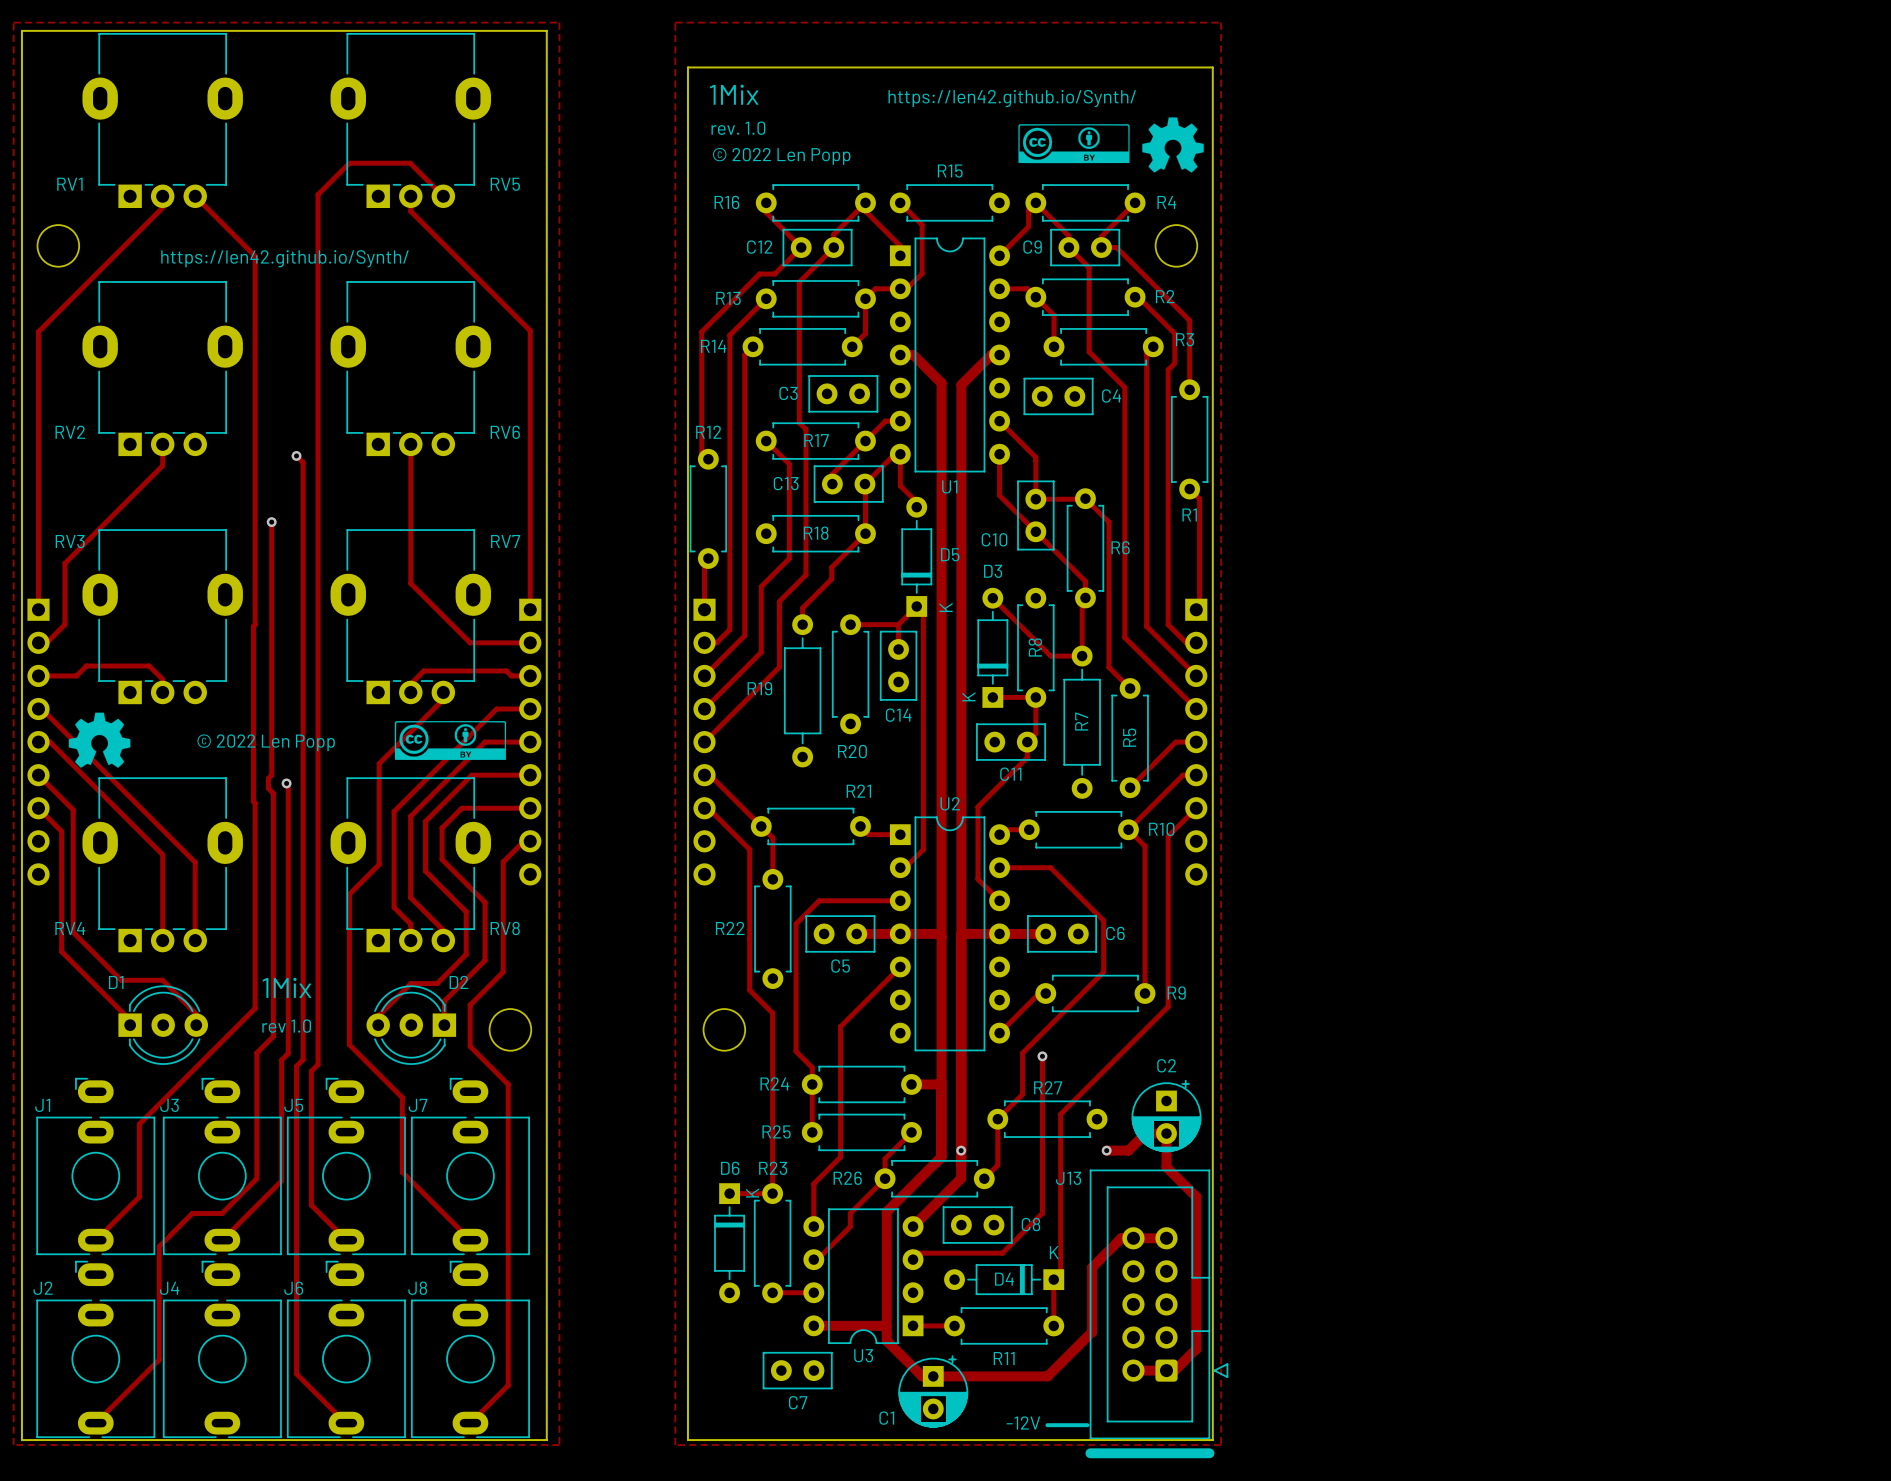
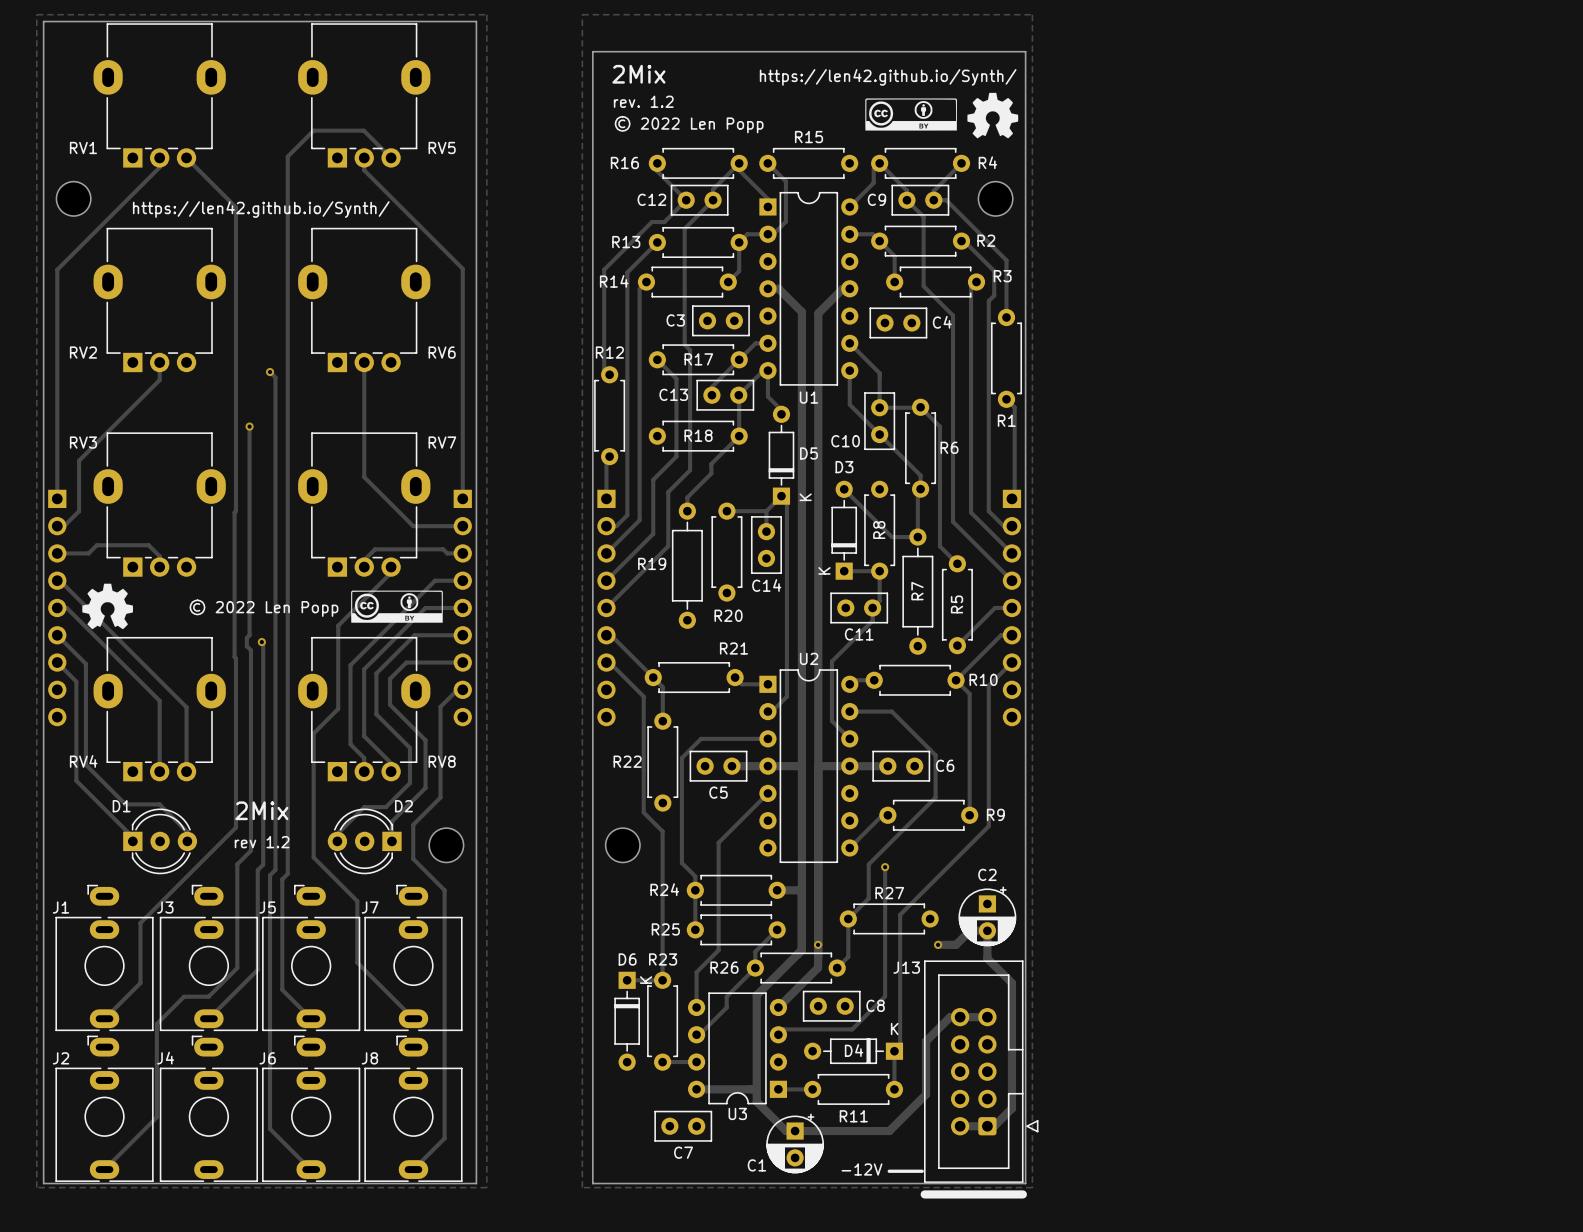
text: 1Mix (734, 94) -> 2Mix (638, 74)
text: rev. 1.0 (738, 128) -> rev. 1.2 (643, 101)
text: 1Mix (287, 987) -> 2Mix (261, 810)
text: rev 1.0 (286, 1026) -> rev 1.2 (262, 842)

